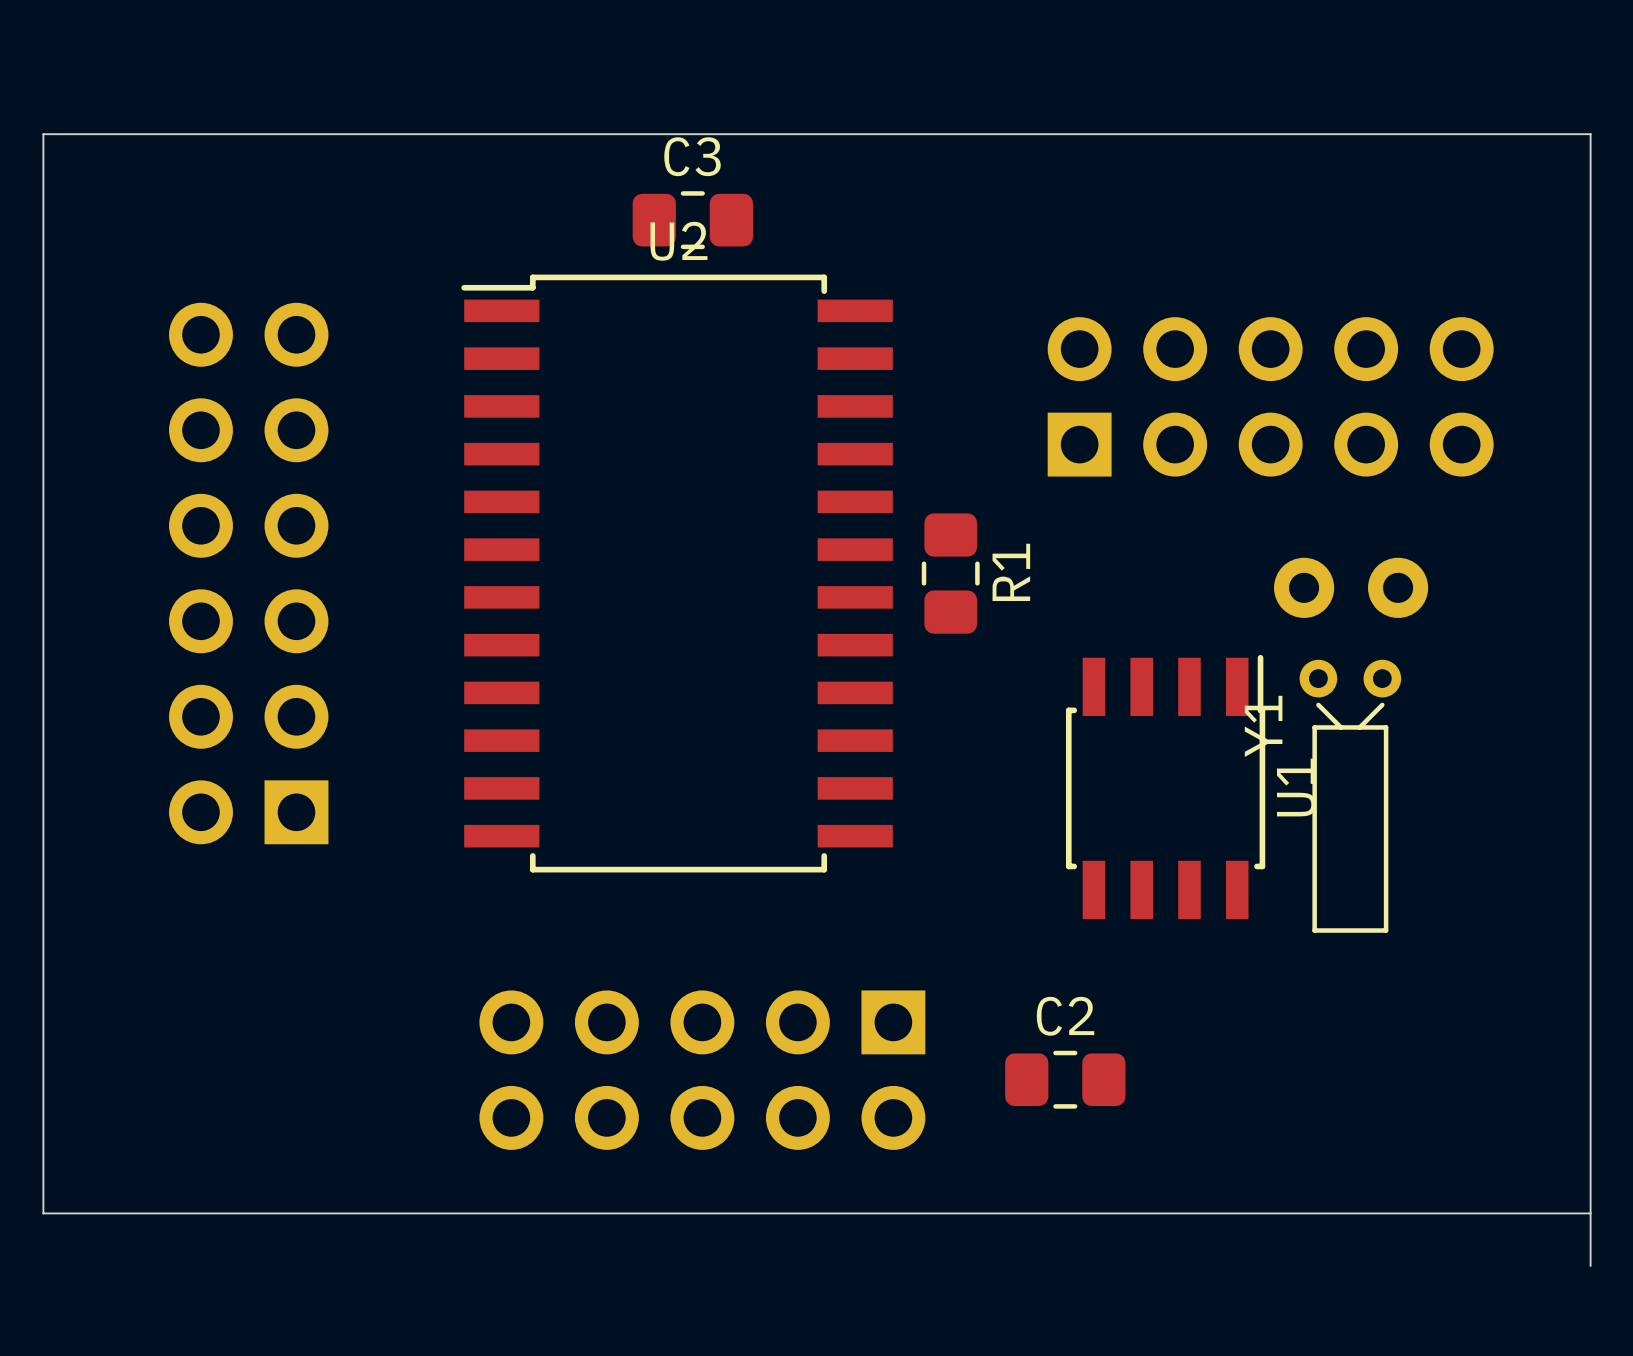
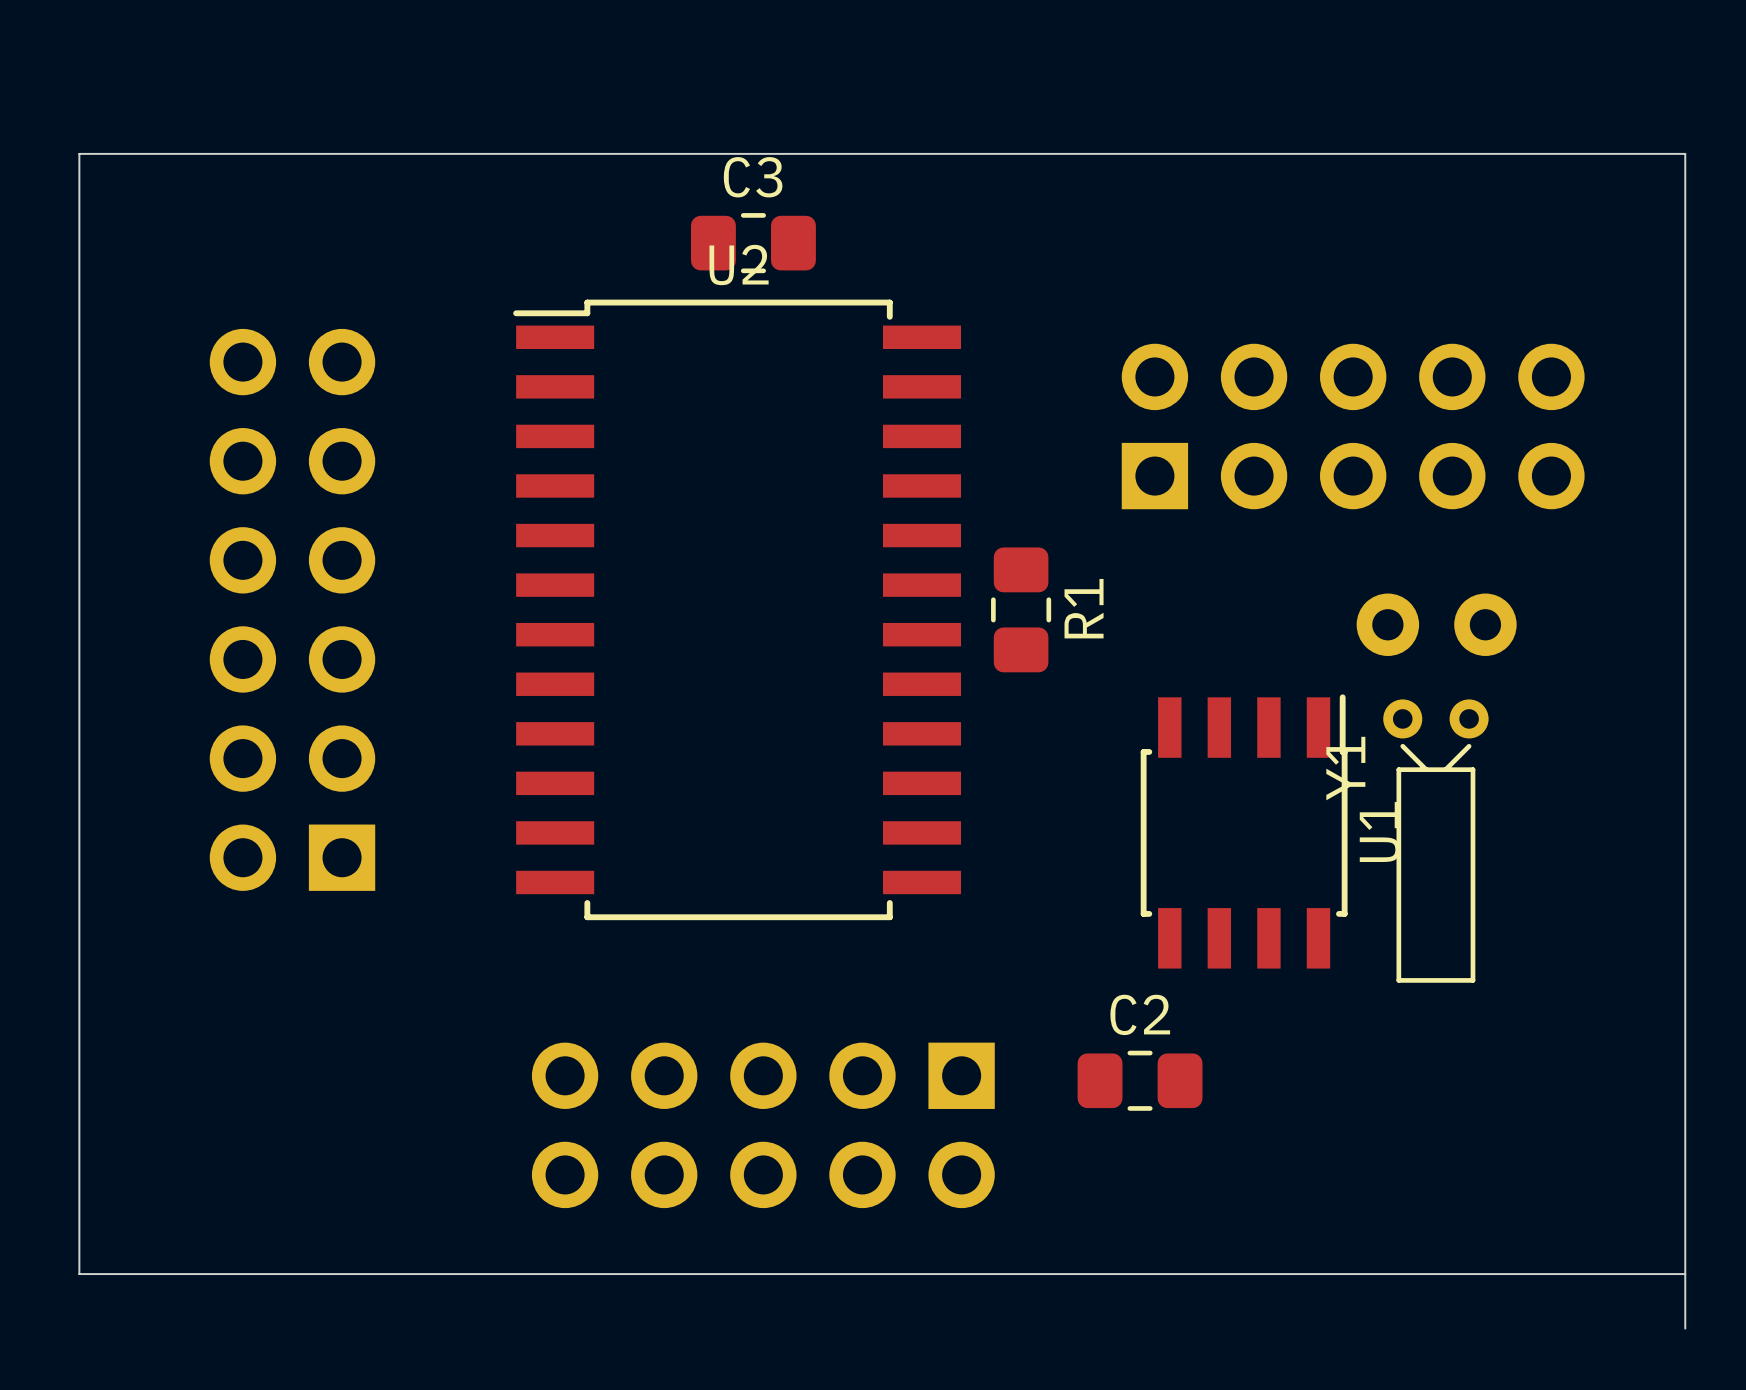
C2 position: (1065, 1079) -> (1140, 1080)

